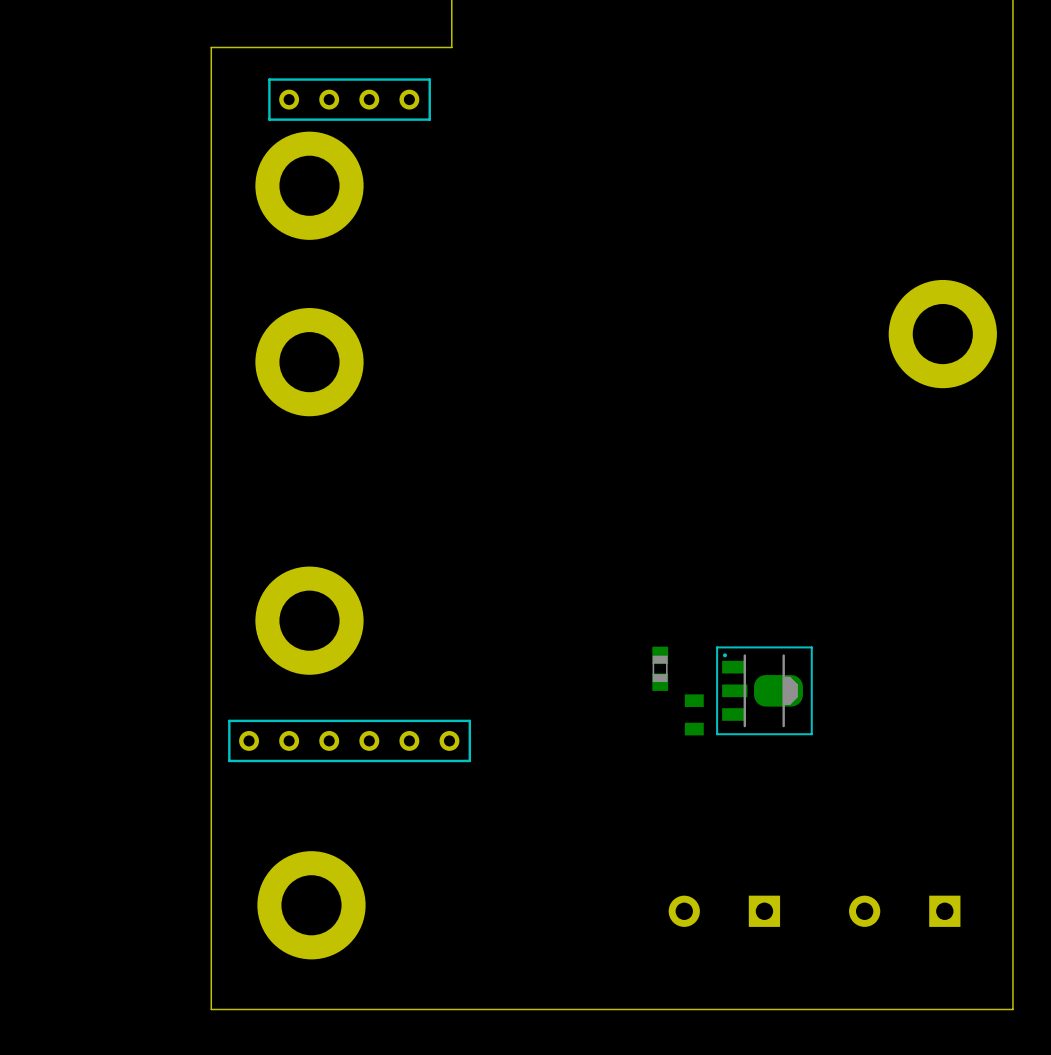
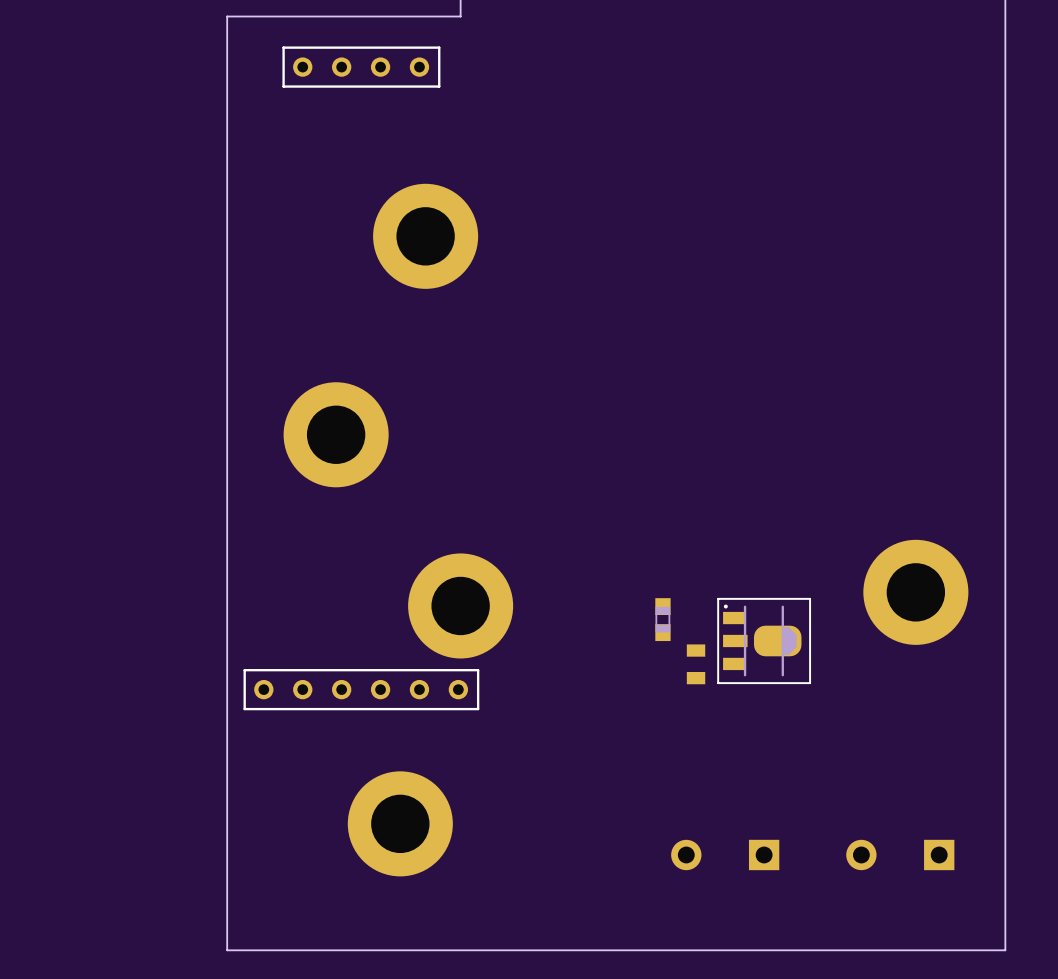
part: (309, 185) -> none
part: none -> (425, 236)
part: (942, 334) -> none
part: (309, 362) -> none
part: none -> (336, 434)
part: (309, 620) -> none
part: none -> (915, 592)
part: none -> (460, 605)
part position: (311, 905) -> (400, 823)

